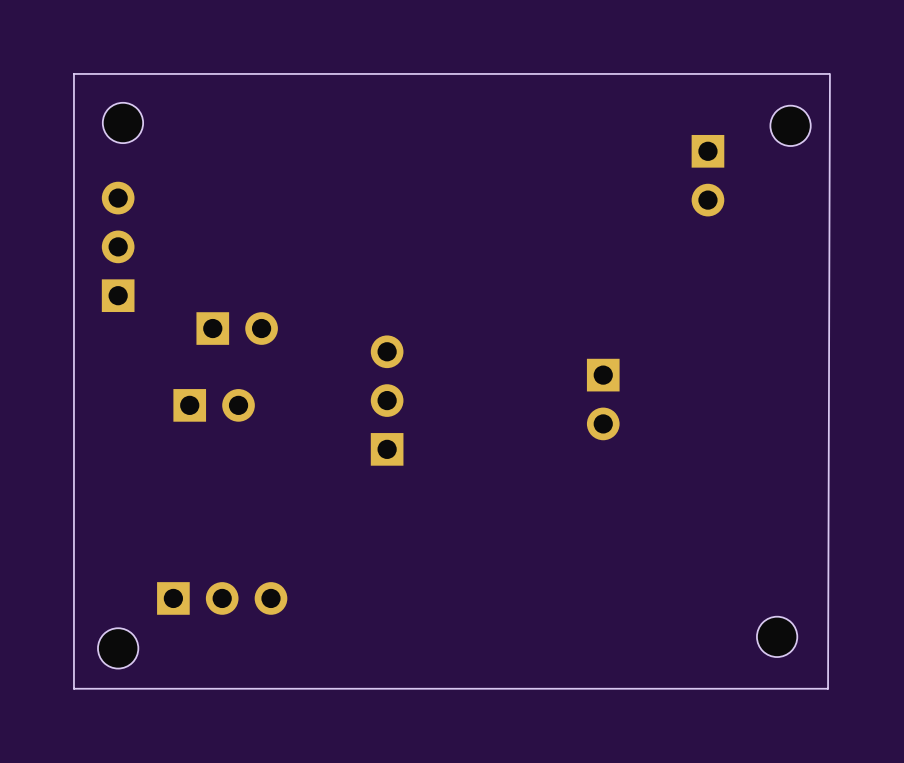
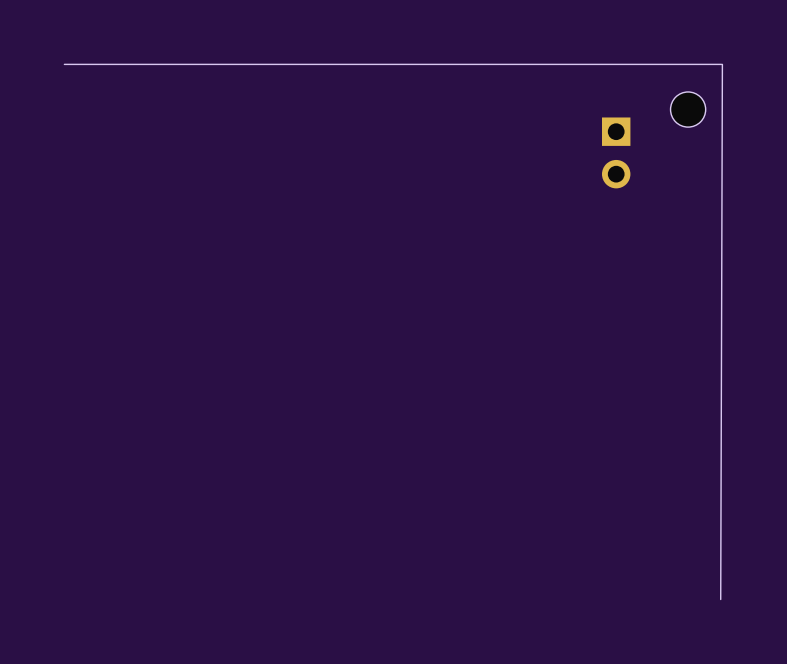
board edge: (73, 73) (73, 688) (828, 688) -> none
part: (122, 122) -> none
part: (118, 246) -> none
part: (237, 328) -> none
part: (603, 399) -> none
part: (387, 400) -> none
part: (214, 405) -> none
part: (222, 598) -> none
part: (777, 636) -> none
part: (118, 648) -> none

